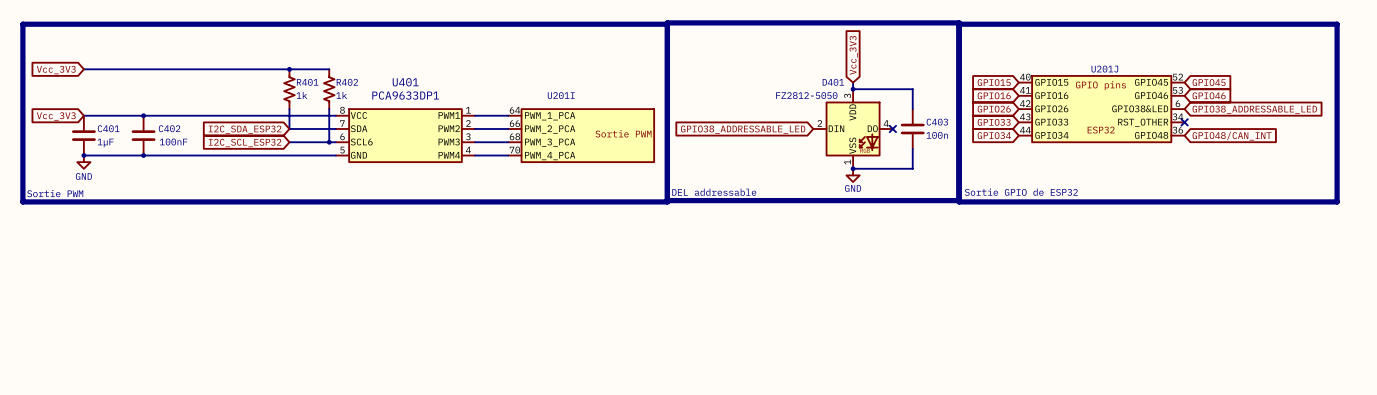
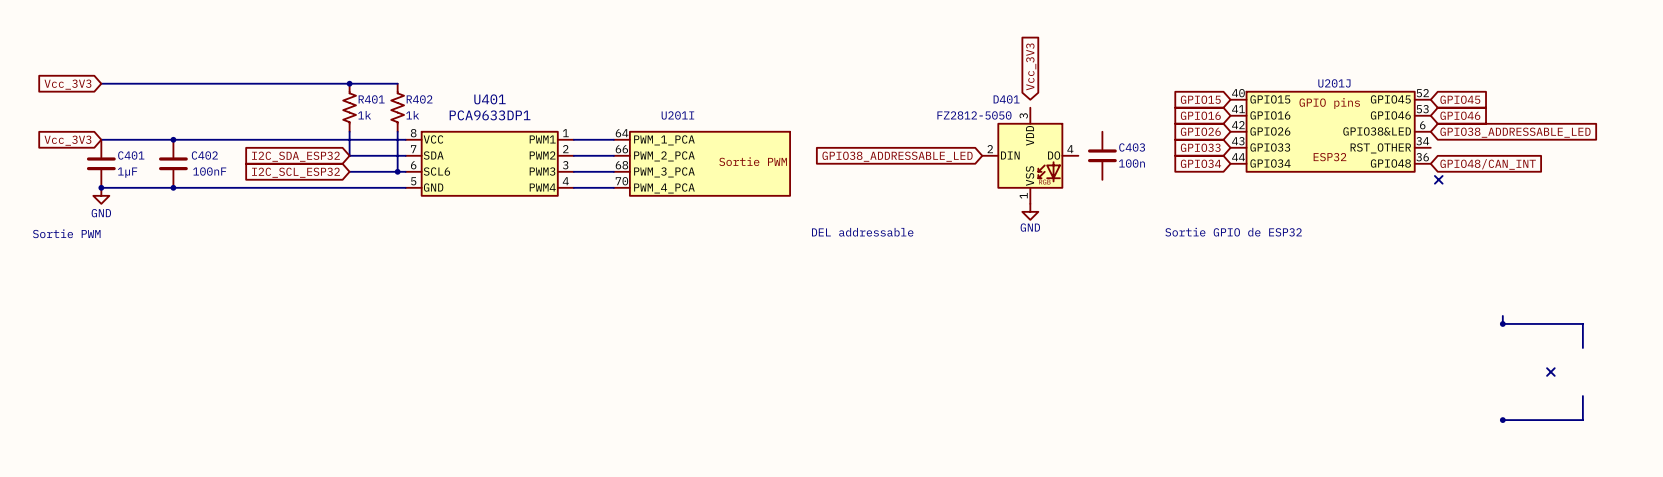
line: (667, 24) (22, 24) (22, 201) (667, 201) (667, 22) (959, 22) (959, 201) (1337, 201) (1337, 24) (959, 24) -> none
wire: (853, 82) (853, 89) (912, 89) (912, 109) -> none
junction: (853, 89) -> none
no-connect mark position: (1184, 122) -> (1438, 179)
no-connect mark: (892, 128) -> none
wire: (912, 148) (912, 168) (853, 168) -> none
junction: (853, 168) -> none
line: (667, 200) (959, 200) -> none
wire: none -> (1502, 315) (1502, 323) (1582, 323) (1582, 348)
junction: none -> (1502, 323)
no-connect mark: none -> (1550, 372)
wire: none -> (1582, 396) (1582, 420) (1502, 420)
junction: none -> (1502, 420)

